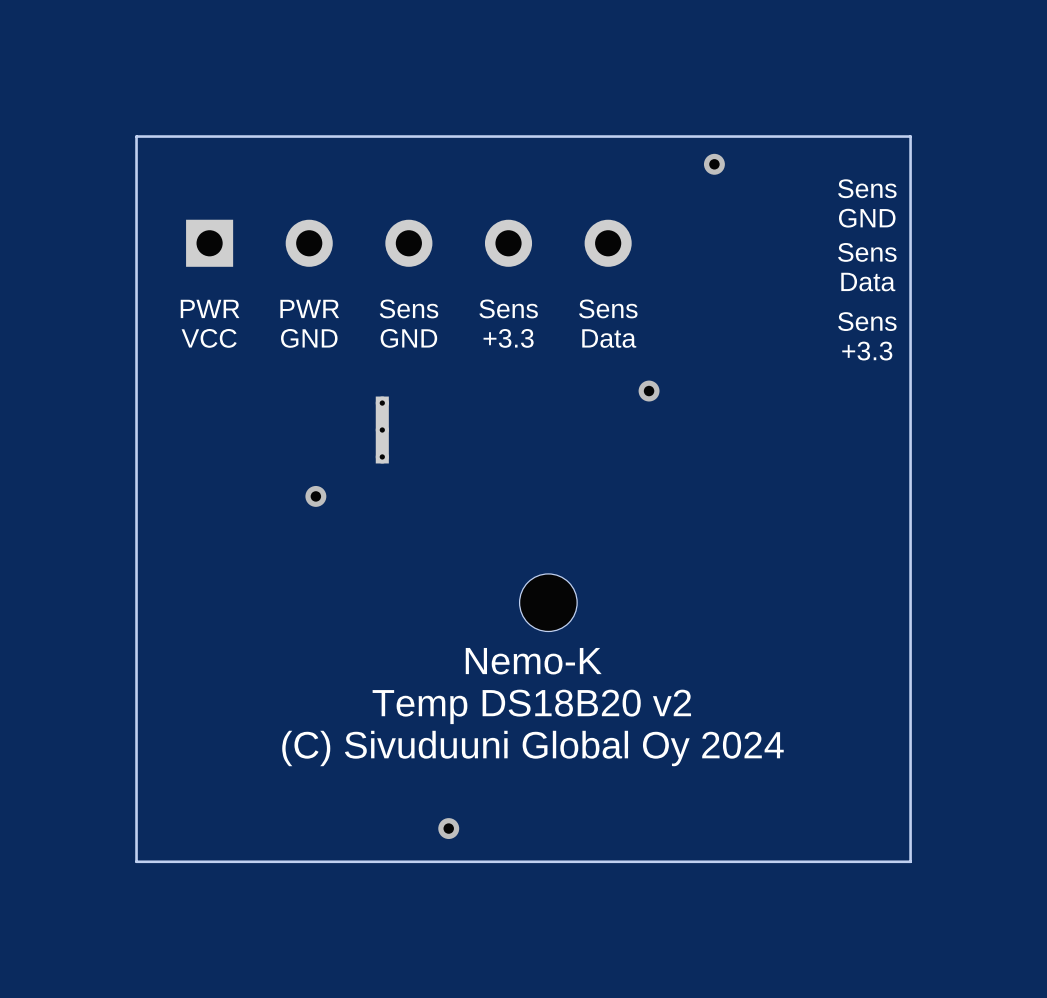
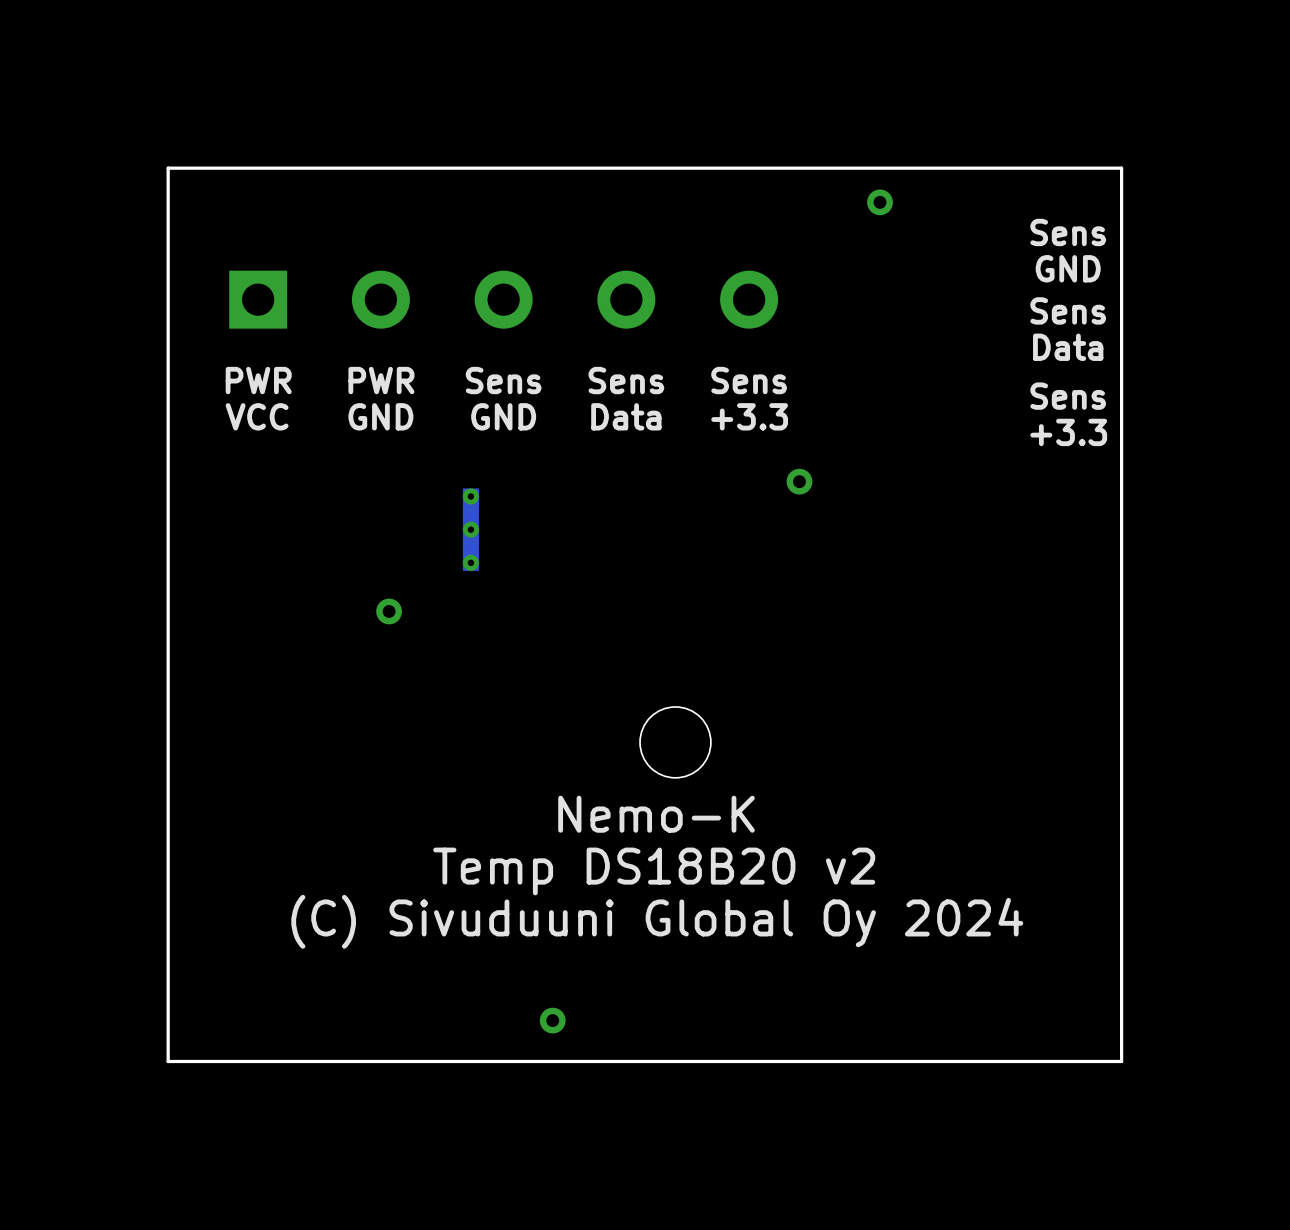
text: +3.3 (508, 338) -> Data (626, 416)
text: Data (609, 338) -> +3.3 (749, 416)

